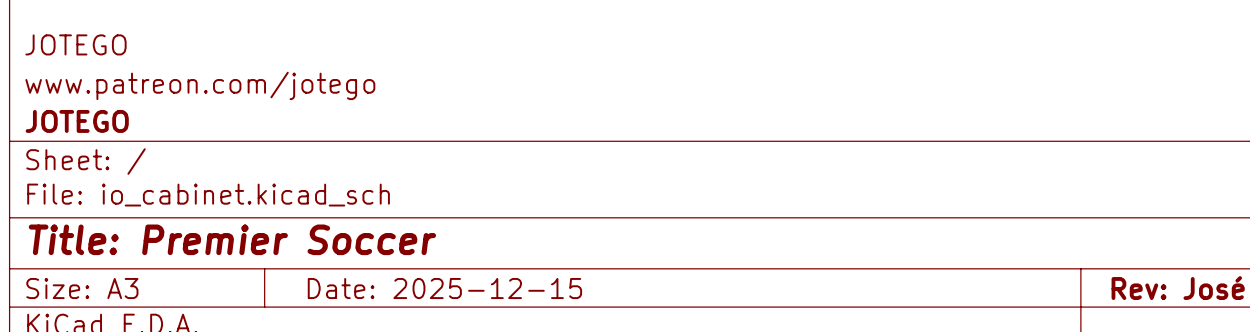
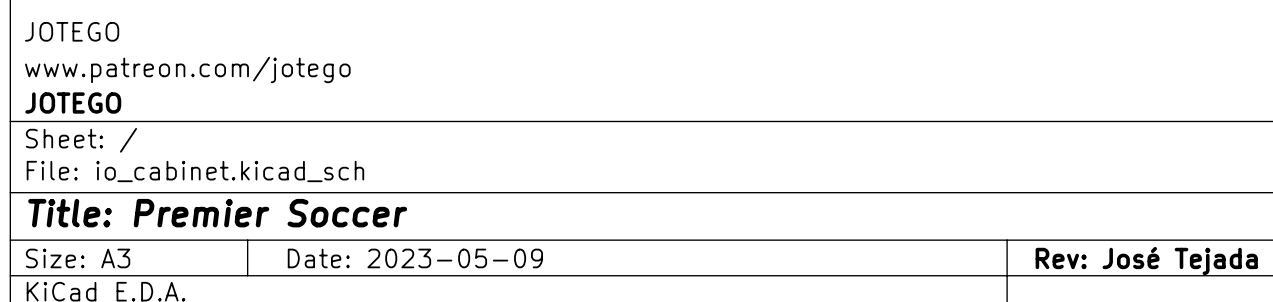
title block: Date: 2025-12-15 (444, 288) -> Date: 2023-05-09 (415, 258)

